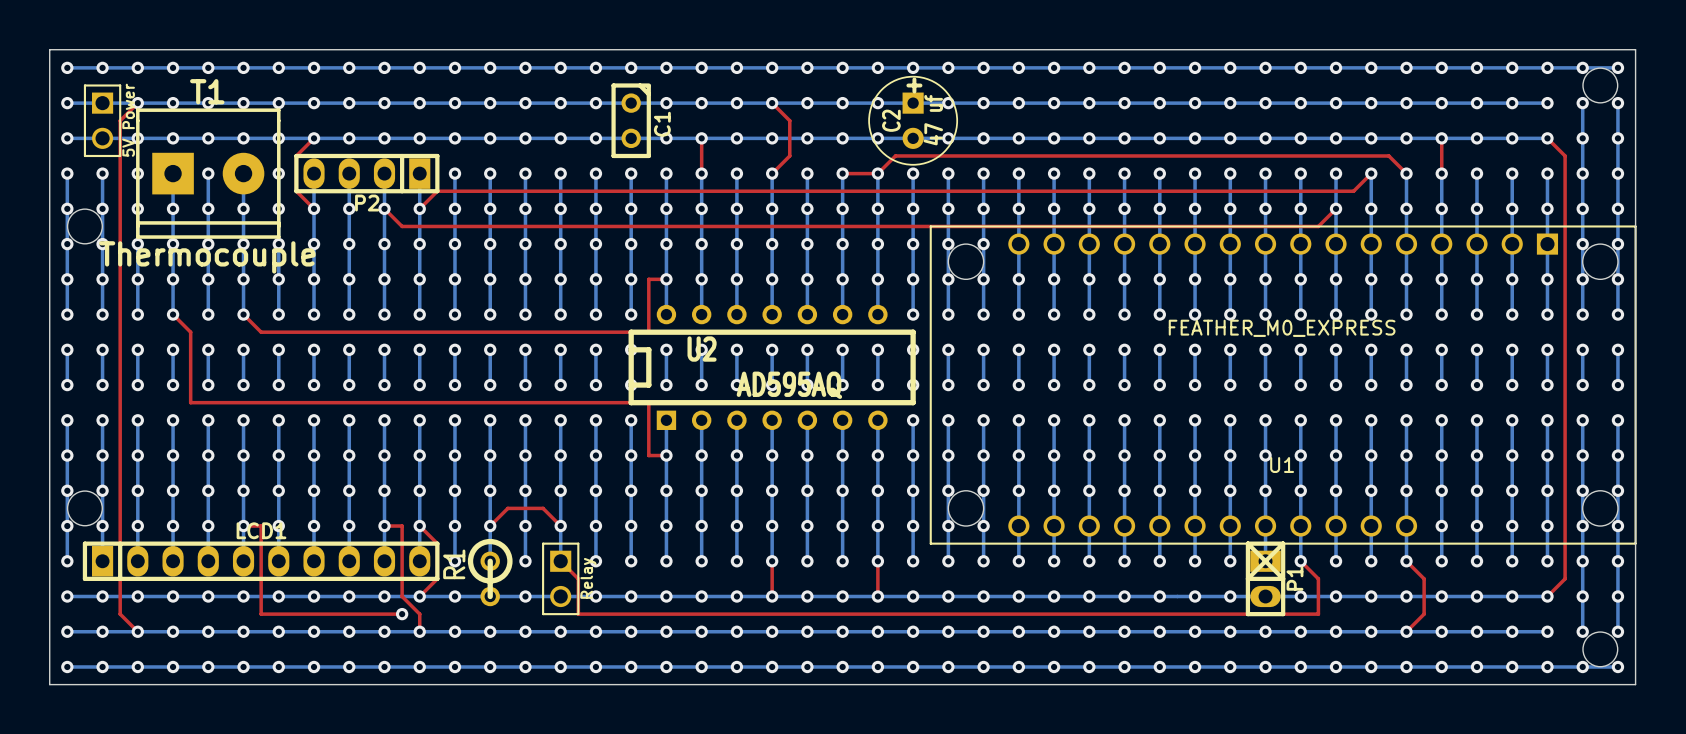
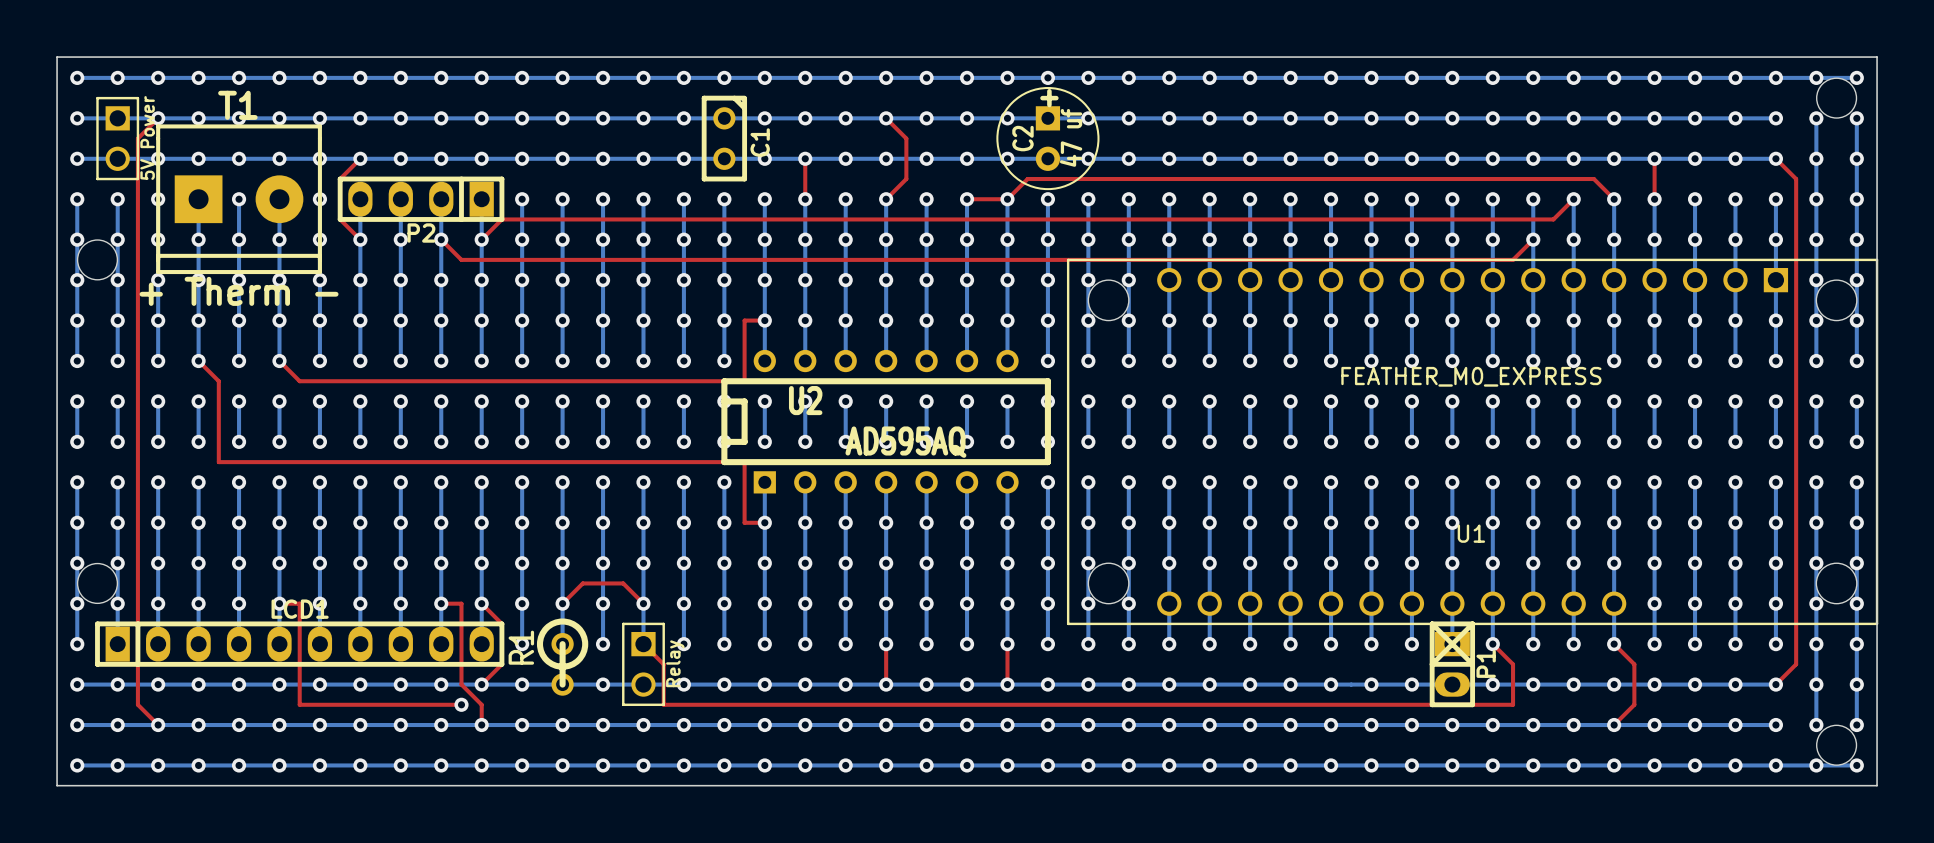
T1 value: Thermocouple (207, 257) -> + Therm - (239, 291)

